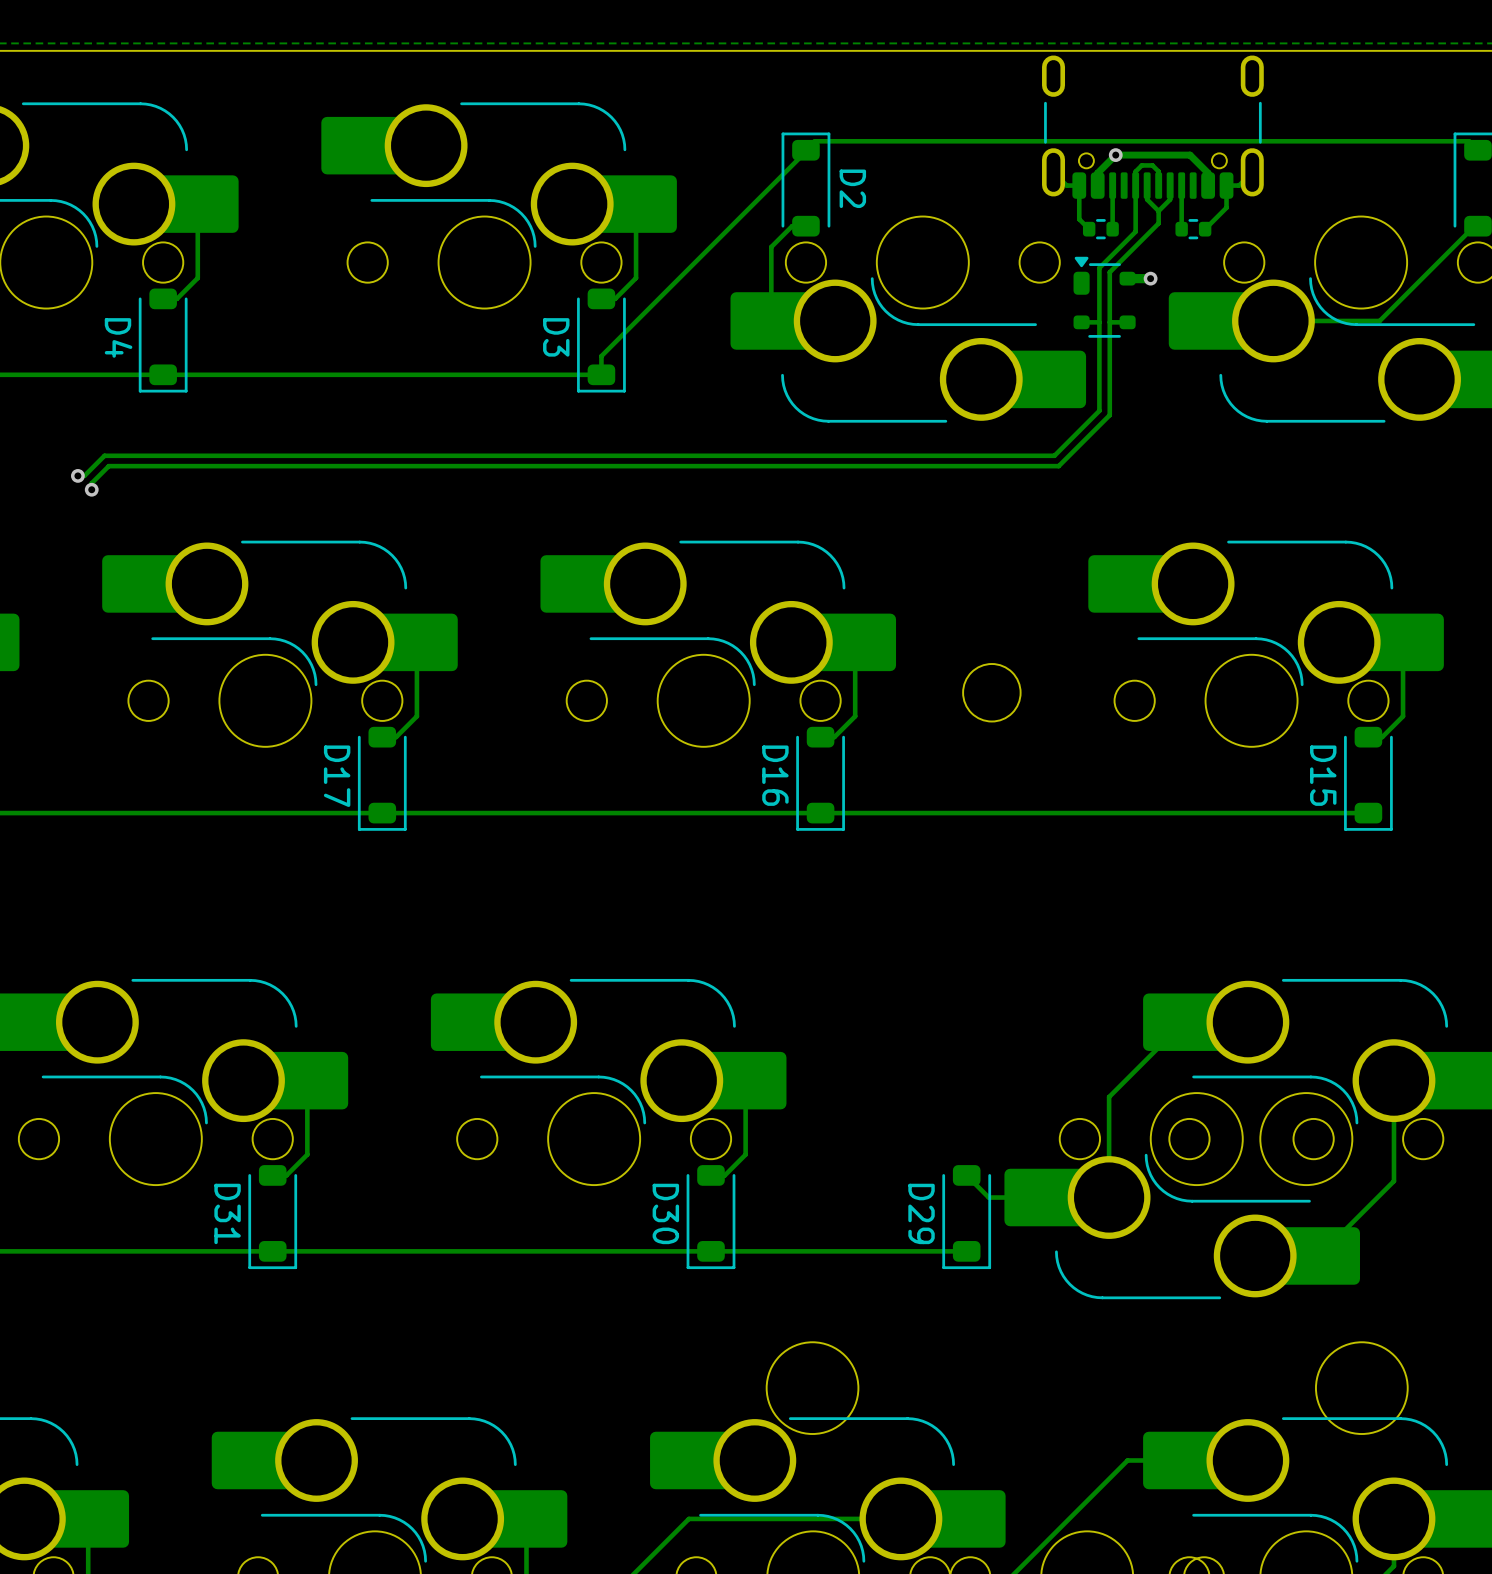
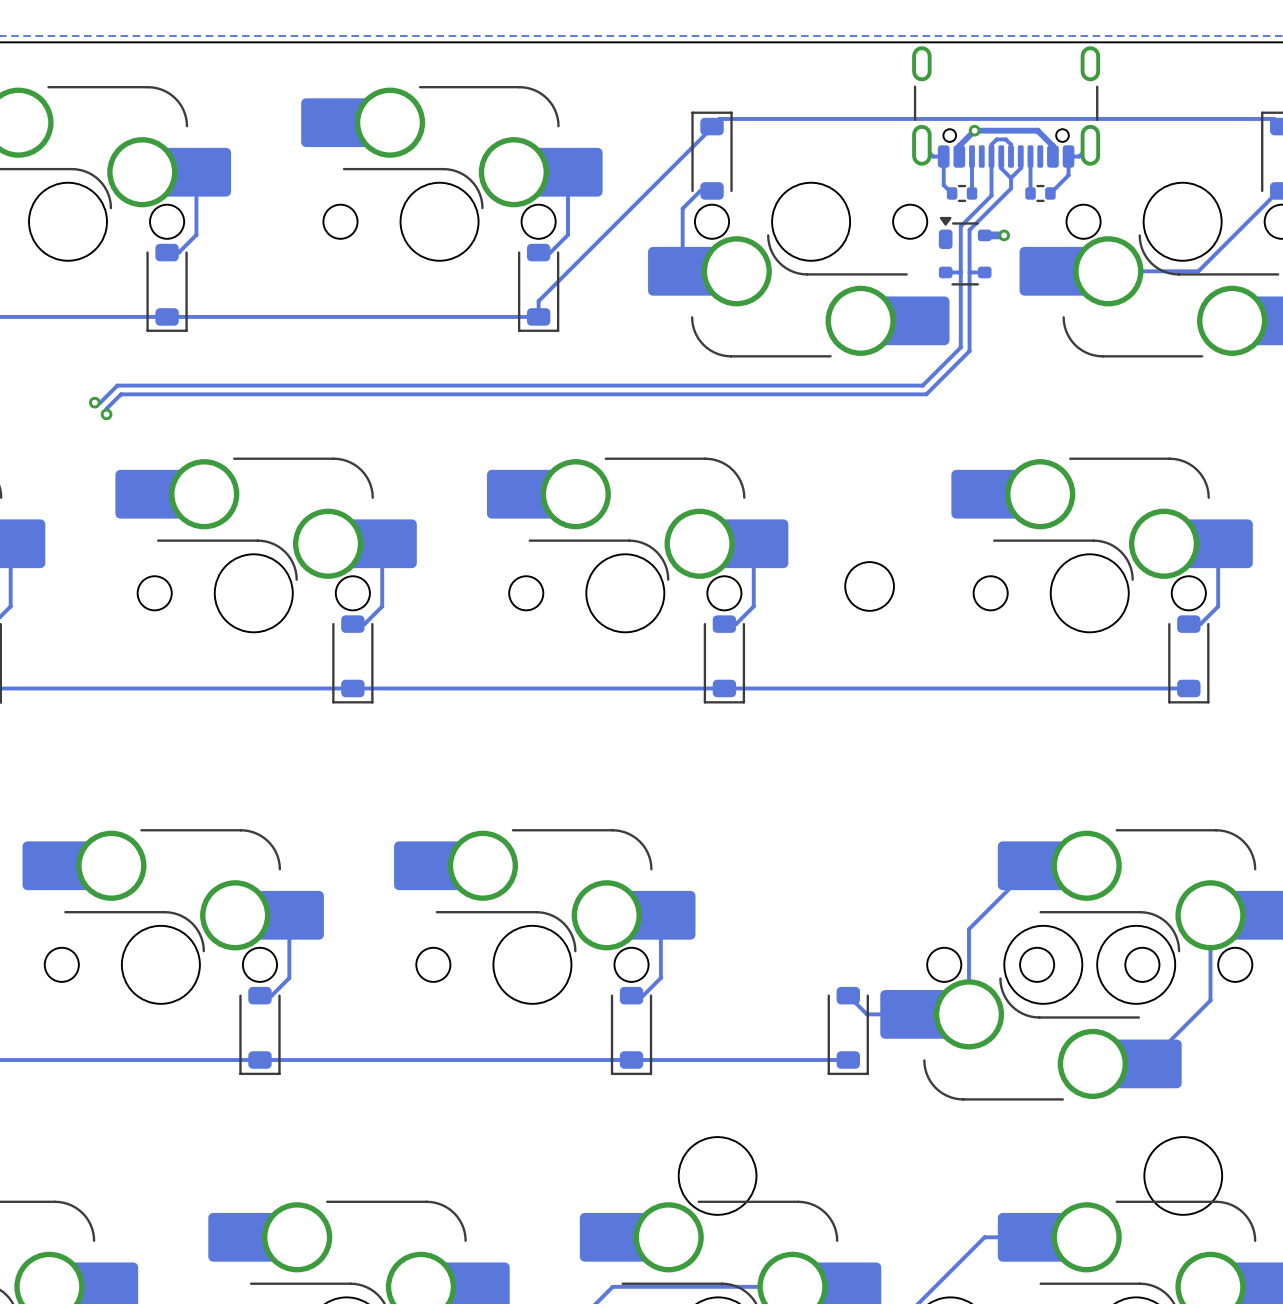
D2 name: D2 (852, 188) -> none
D4 name: D4 (118, 337) -> none
D3 name: D3 (556, 337) -> none
D16 name: D16 (775, 775) -> none
D15 name: D15 (1323, 775) -> none
D17 name: D17 (337, 776) -> none
D31 name: D31 (227, 1213) -> none
D30 name: D30 (665, 1213) -> none
D29 name: D29 (921, 1213) -> none

